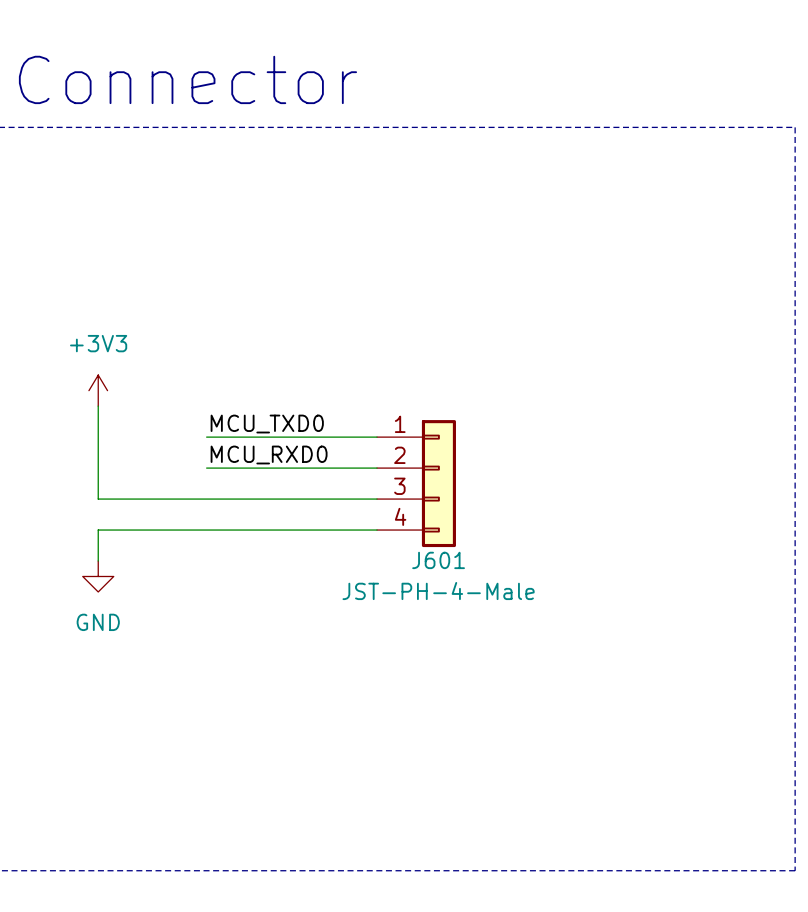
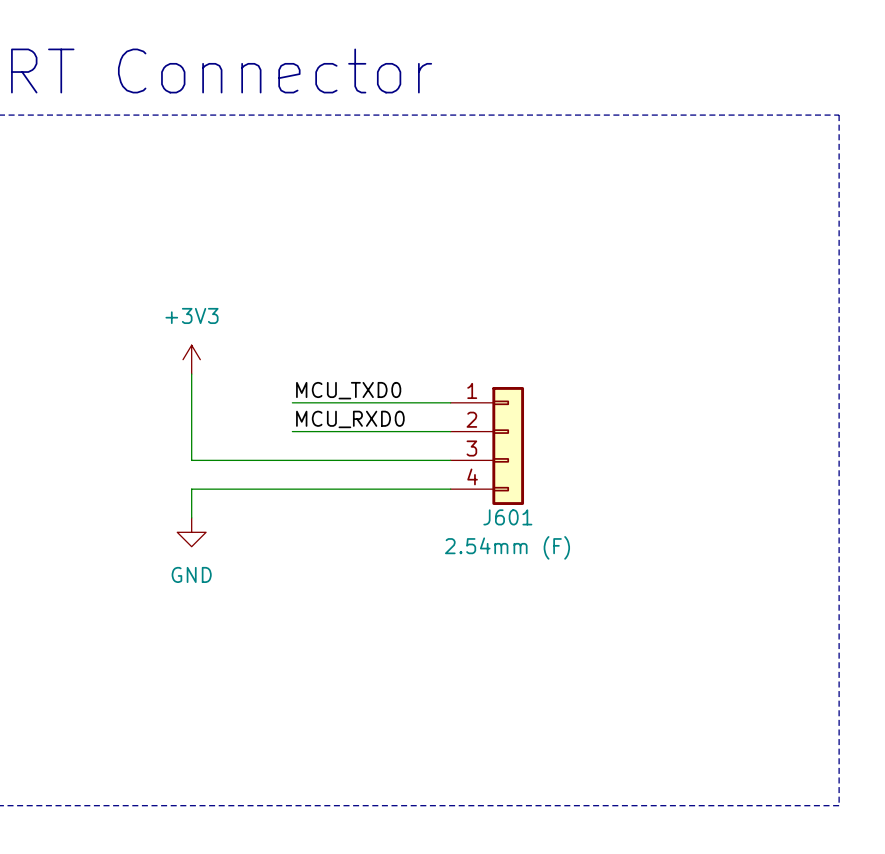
J601 value: JST-PH-4-Male (438, 591) -> 2.54mm (F) (507, 547)

